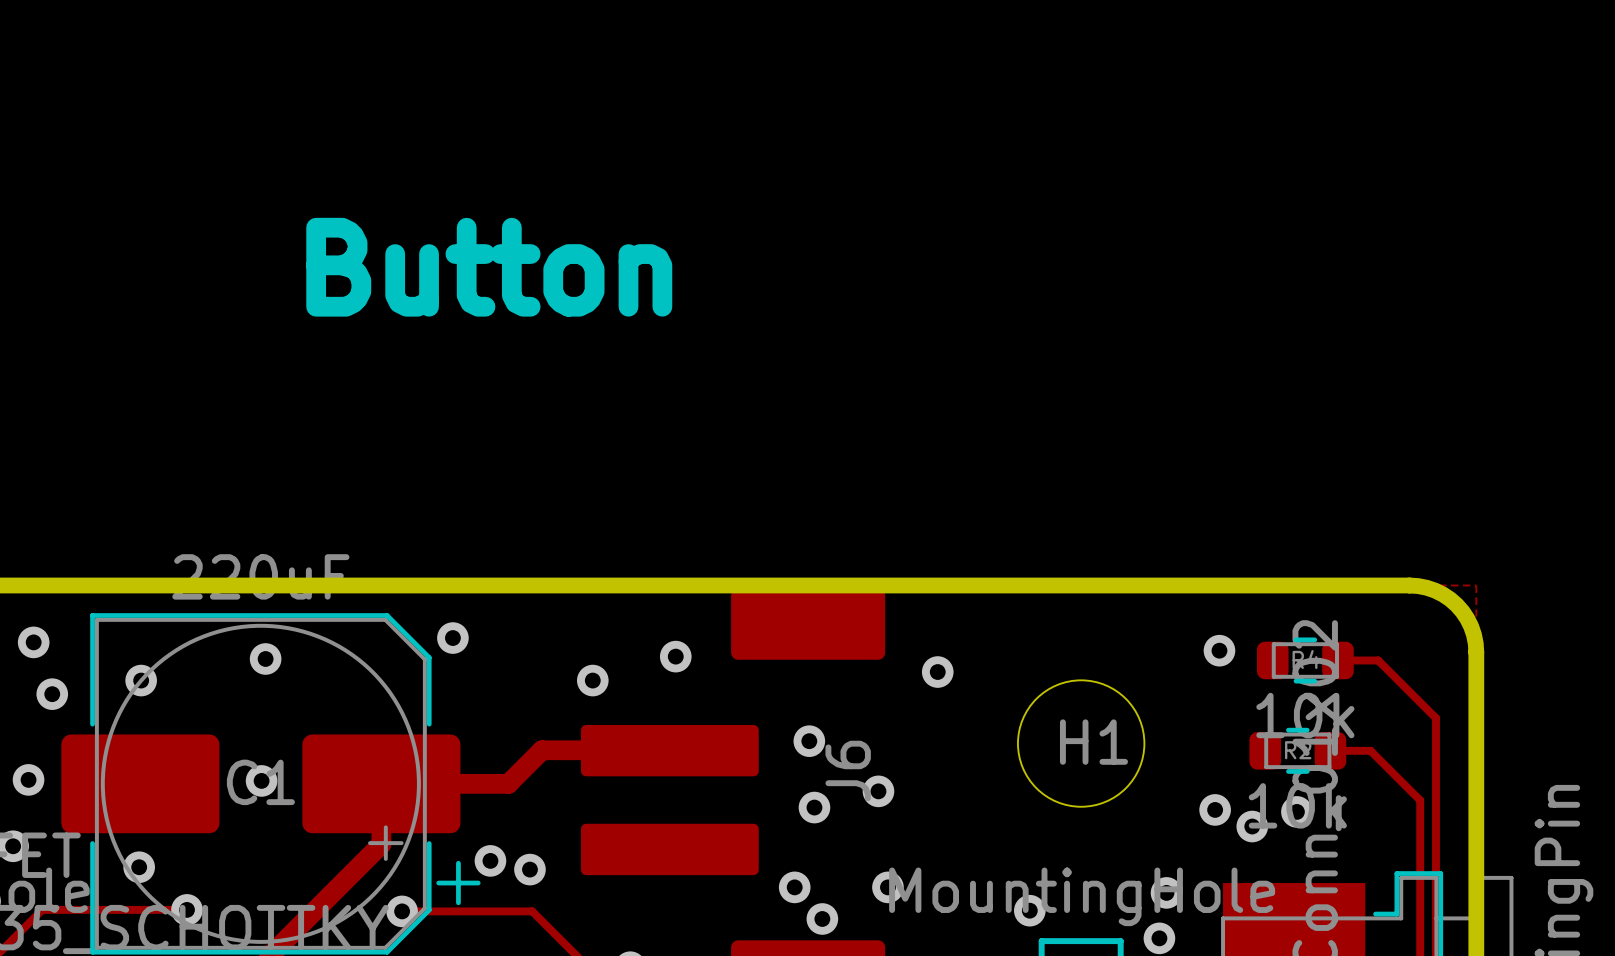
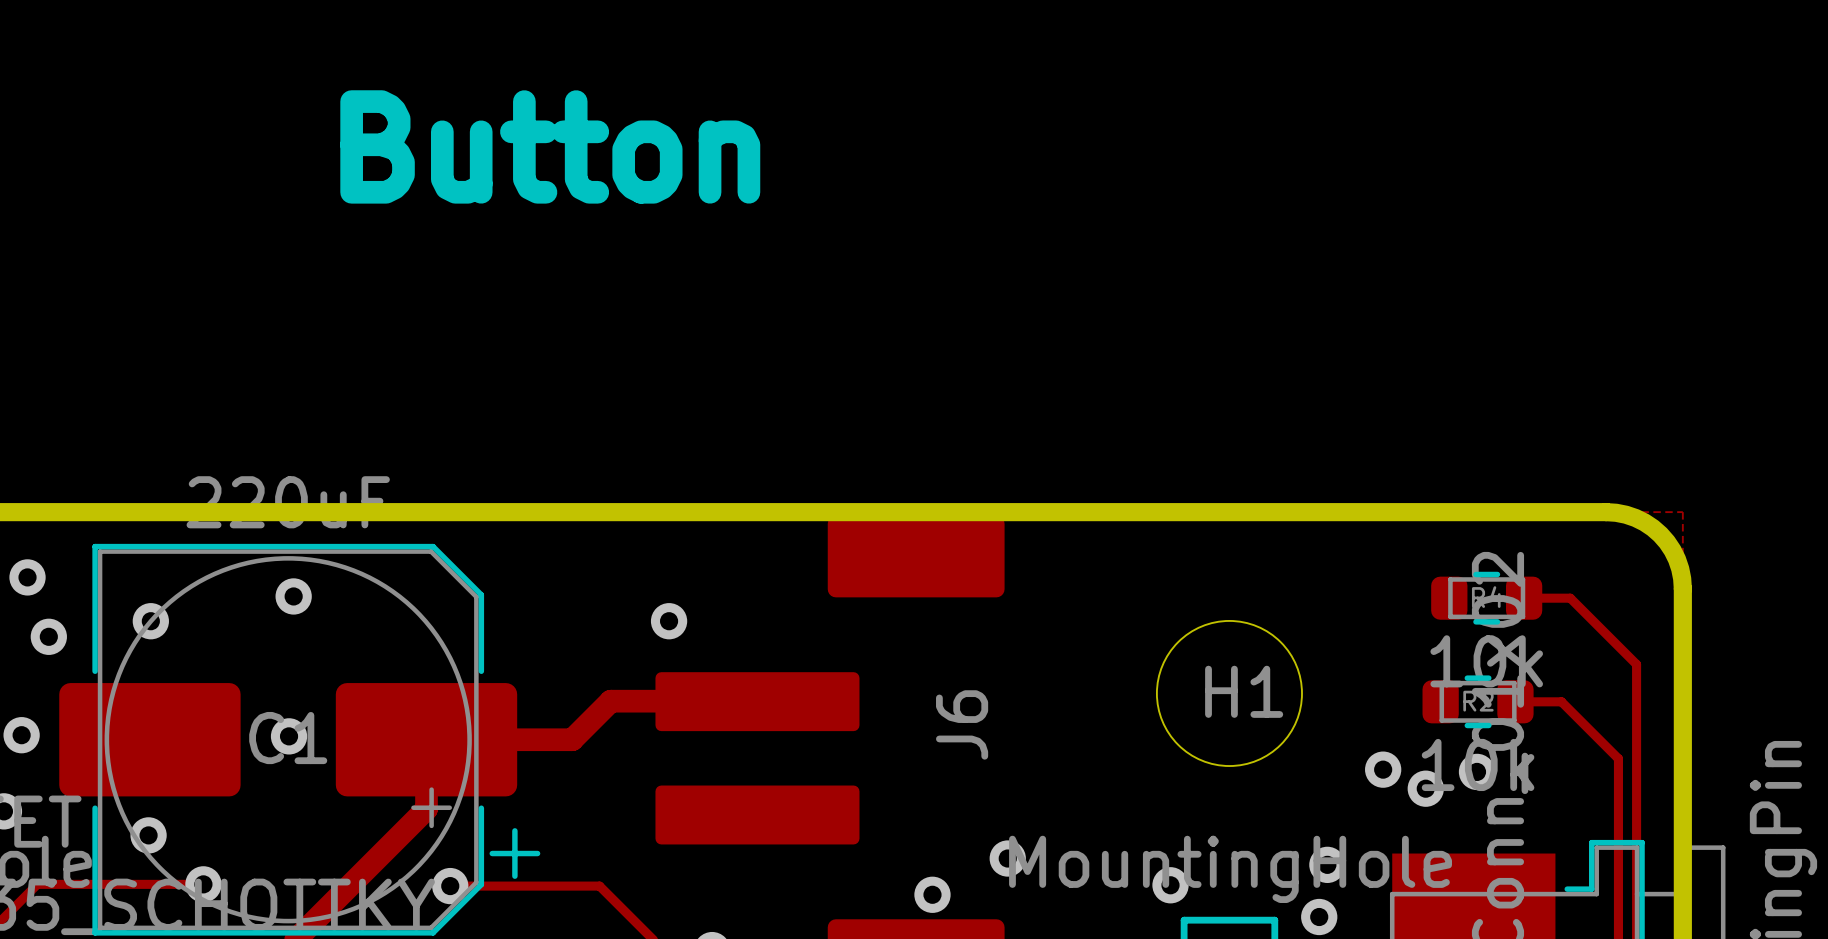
via: (452, 638) -> none
via: (1219, 650) -> none
via: (675, 656) -> none
via: (937, 672) -> none
via: (809, 741) -> none
via: (878, 791) -> none
via: (814, 807) -> none
via: (490, 860) -> none
via: (529, 869) -> none
via: (794, 887) -> none

